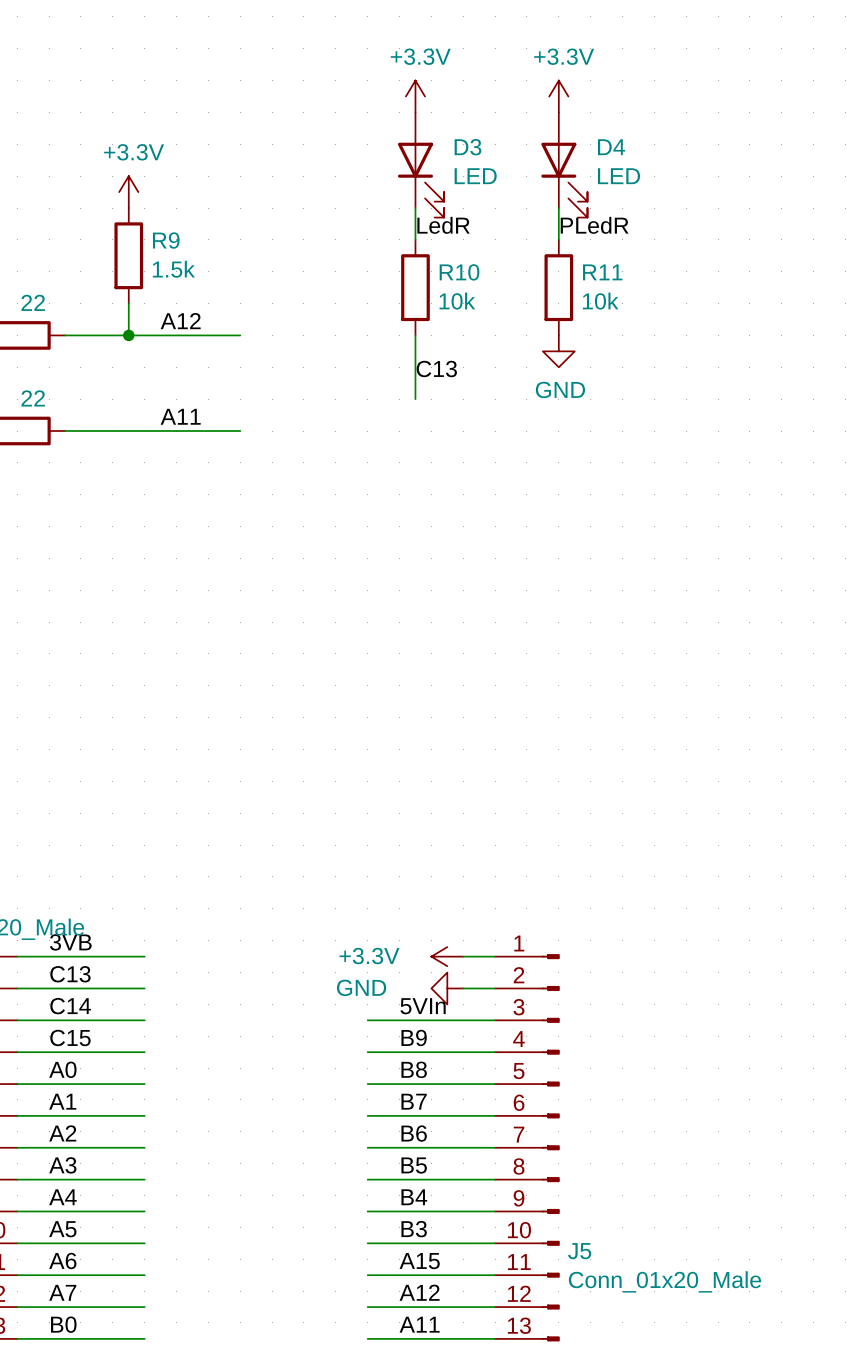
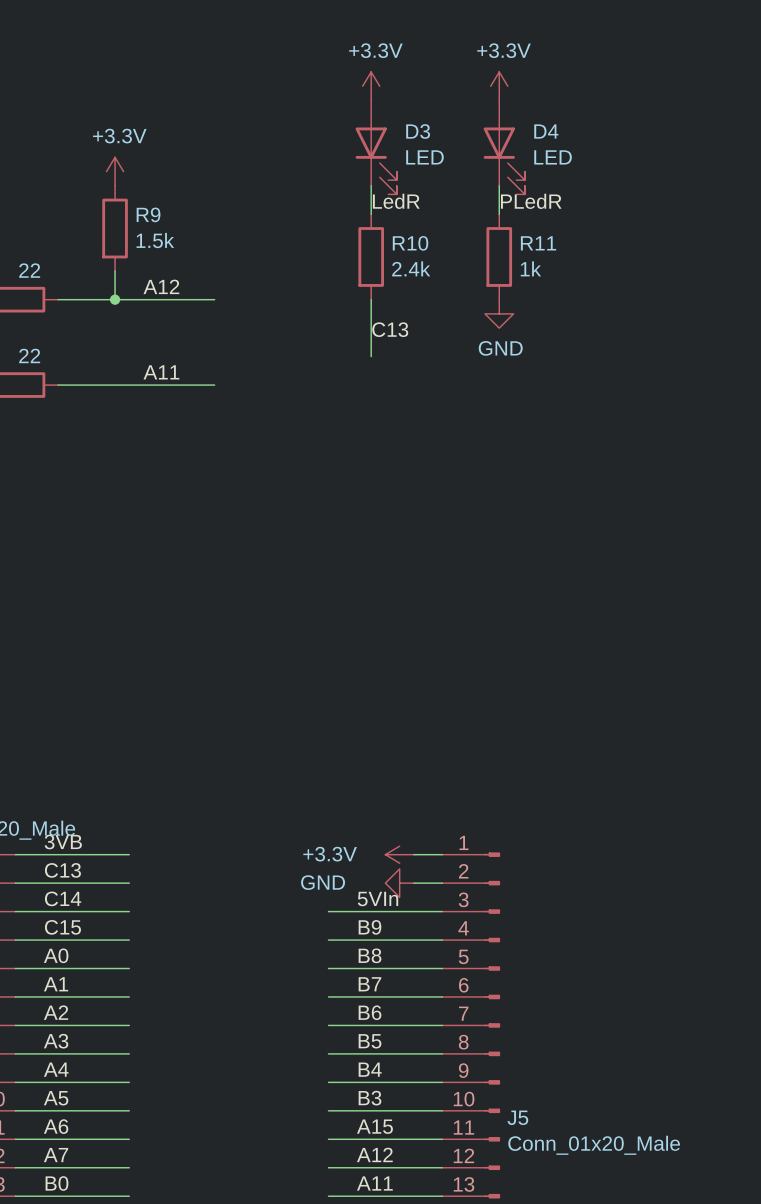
R10 value: 10k (457, 301) -> 2.4k (411, 268)
R11 value: 10k (600, 301) -> 1k (530, 268)

